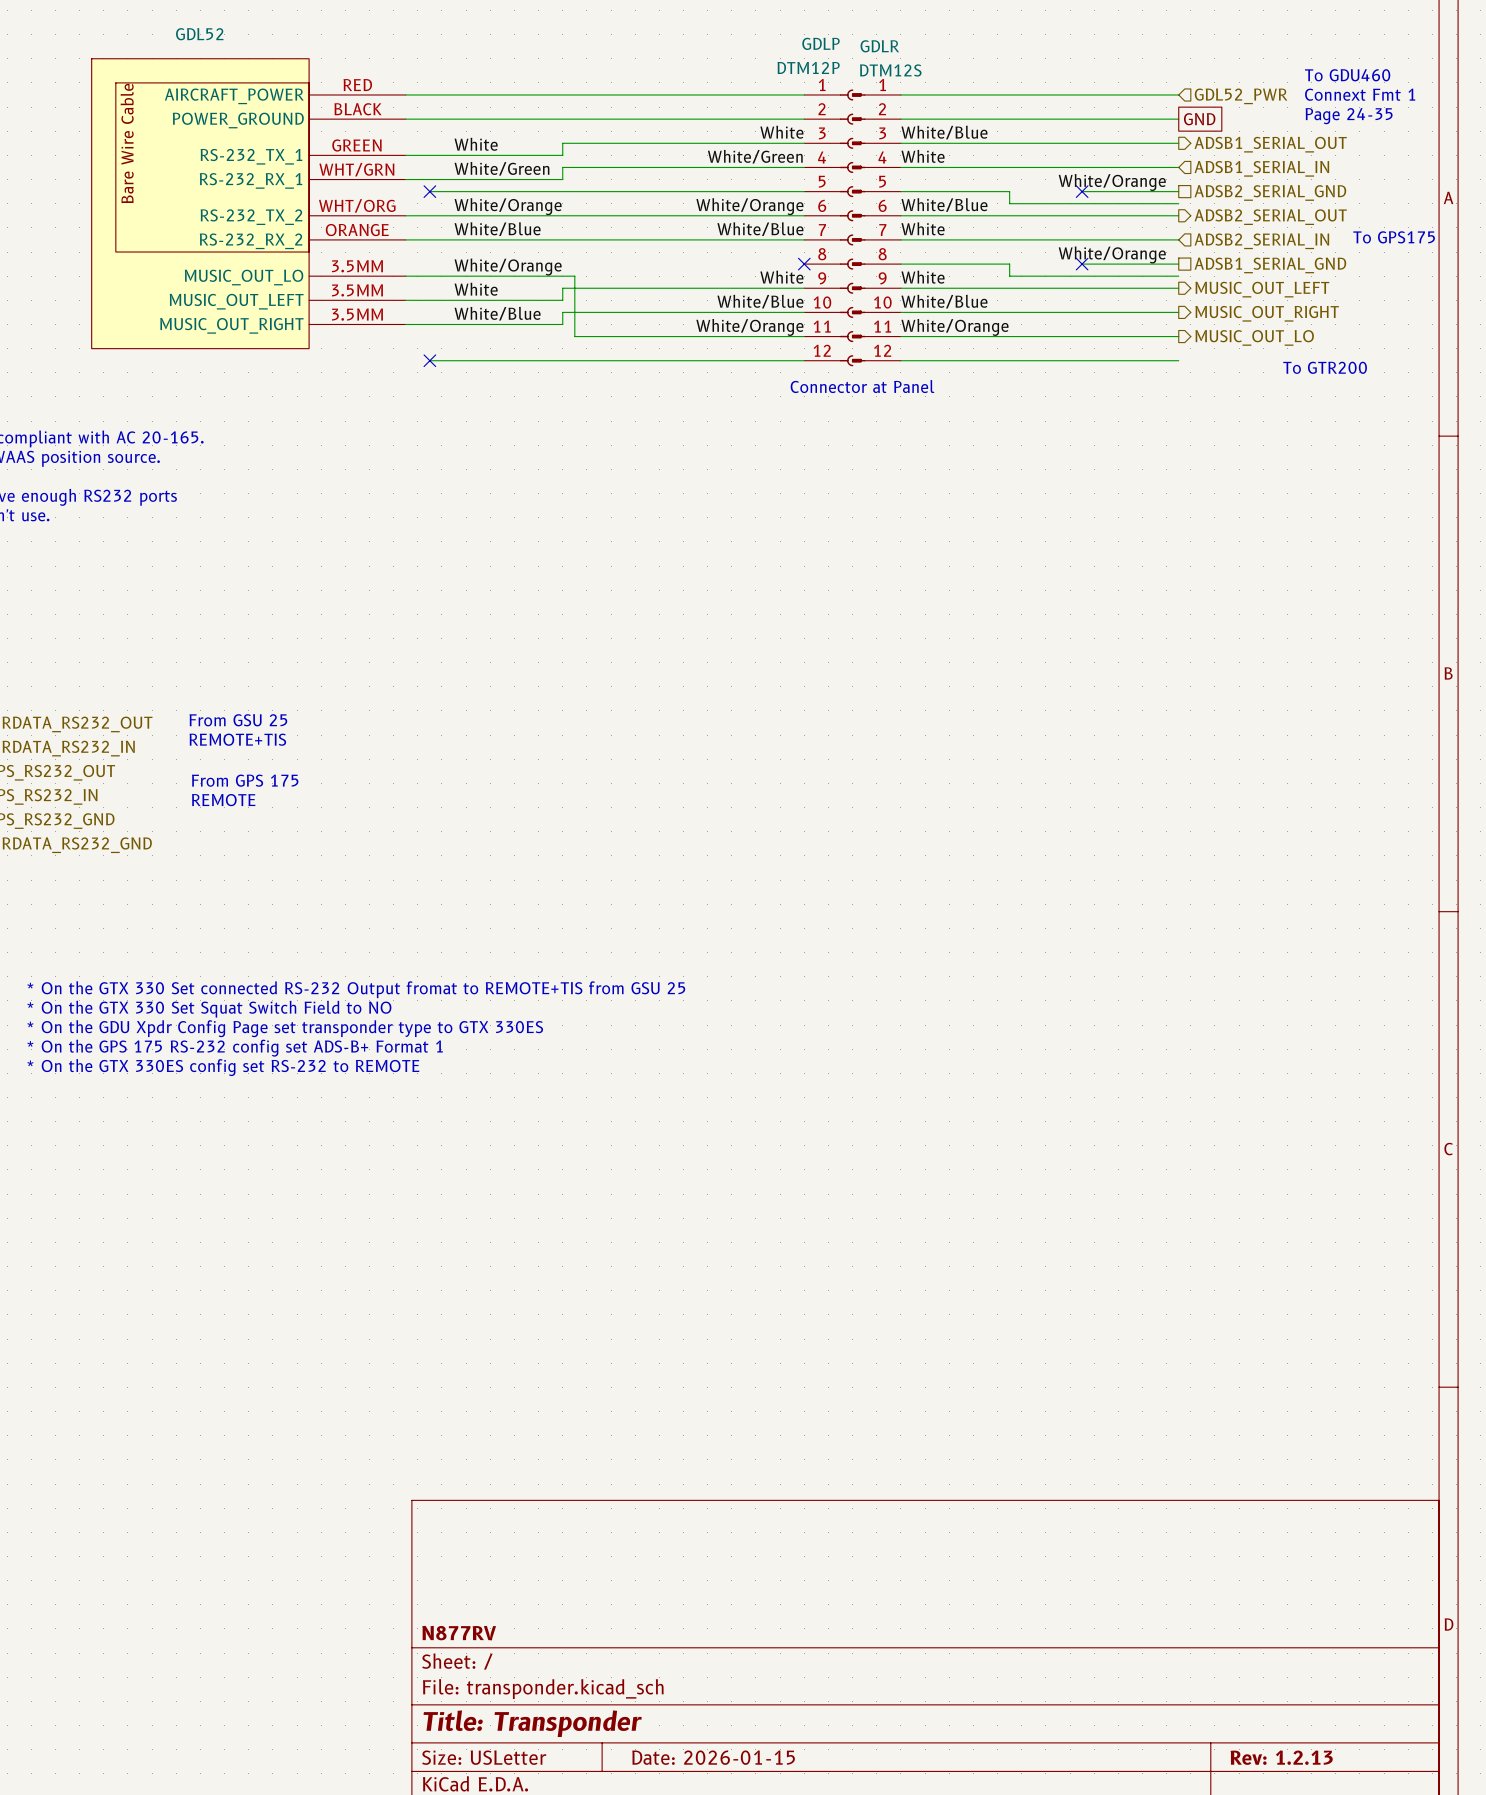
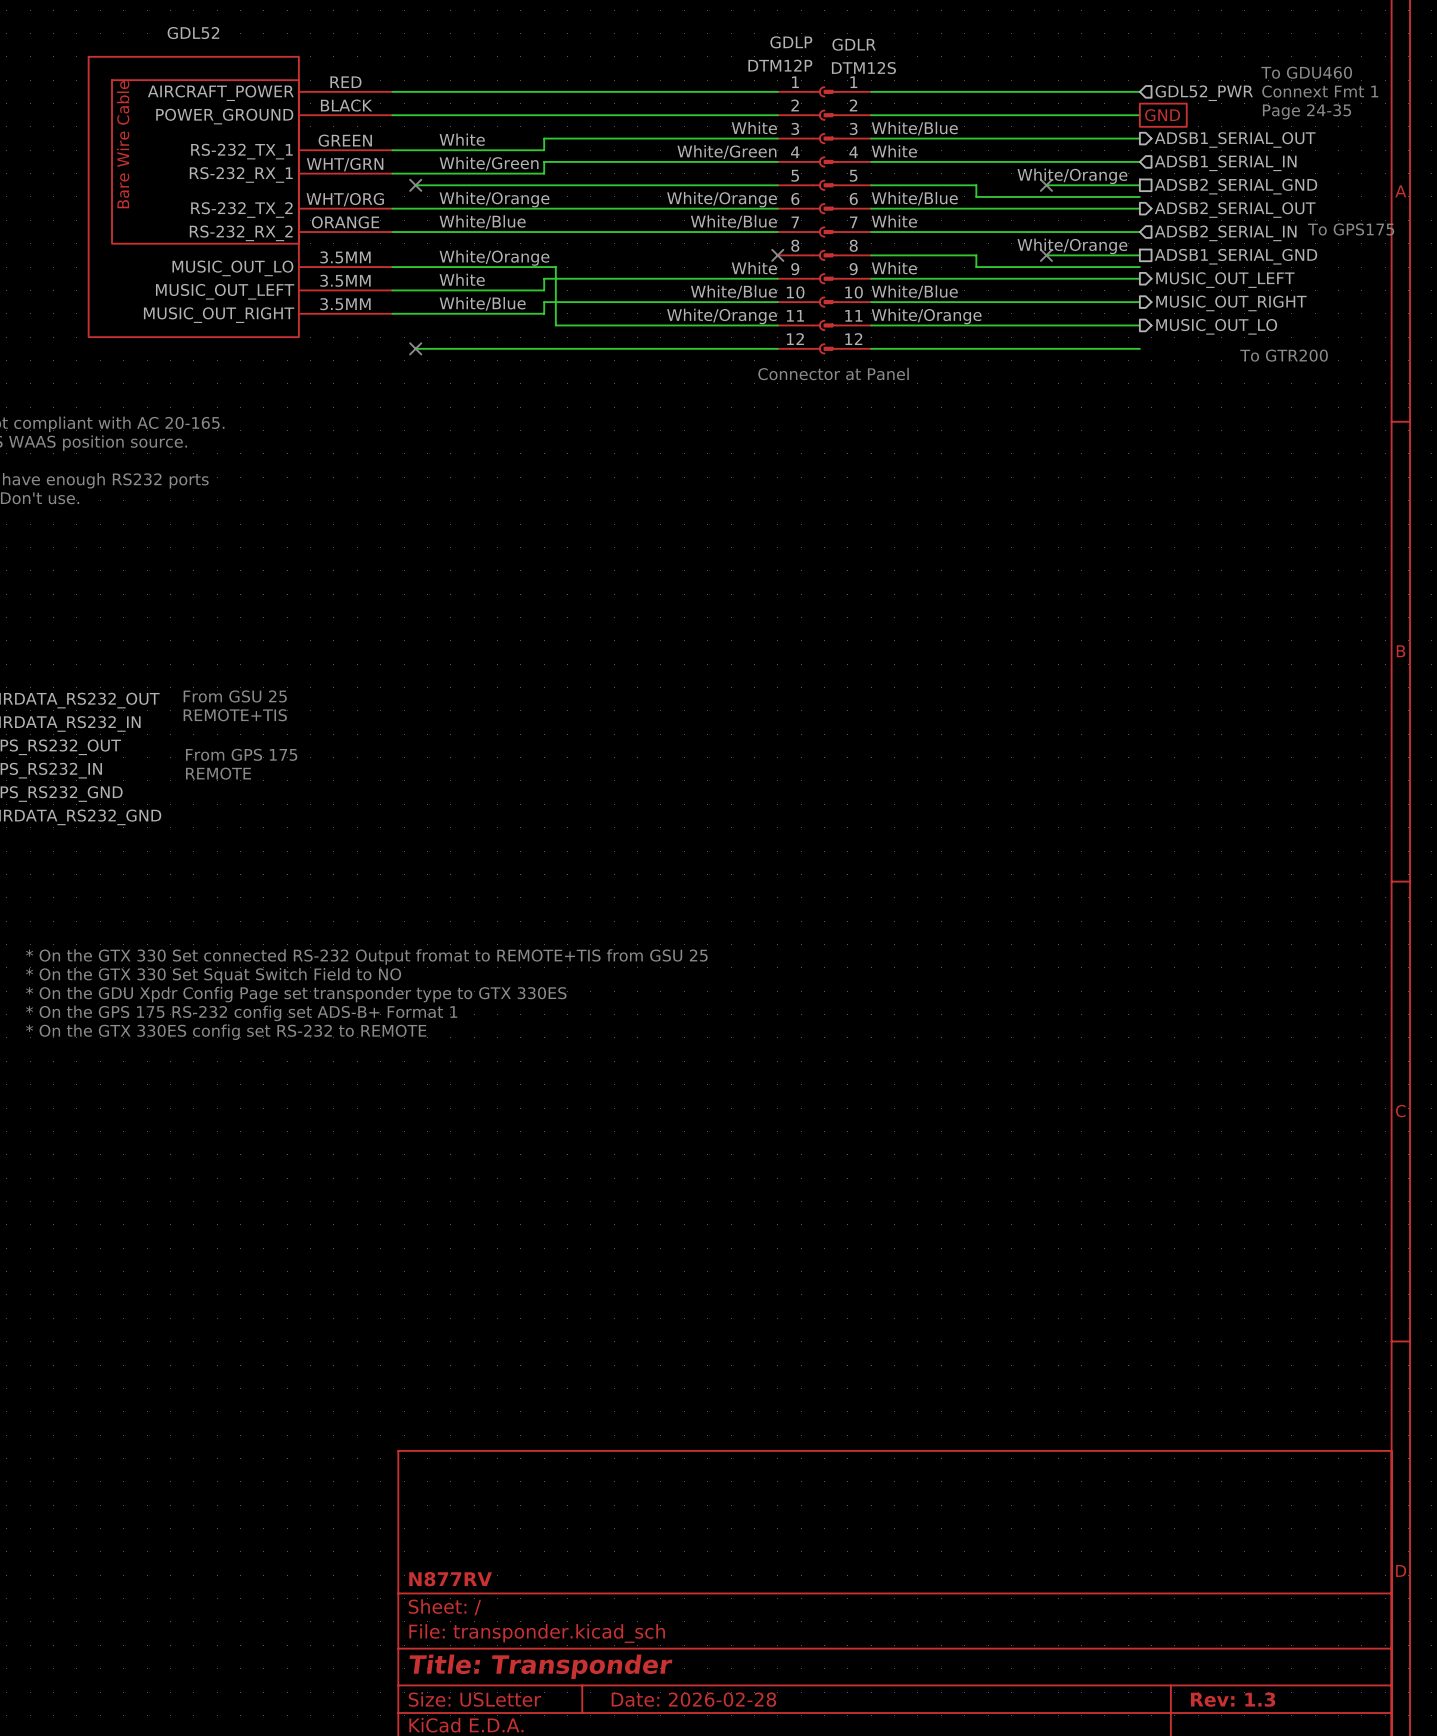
title block: Date: 2026-01-15 (713, 1757) -> Date: 2026-02-28 (693, 1699)
title block: Rev: 1.2.13 (1281, 1757) -> Rev: 1.3 (1233, 1699)

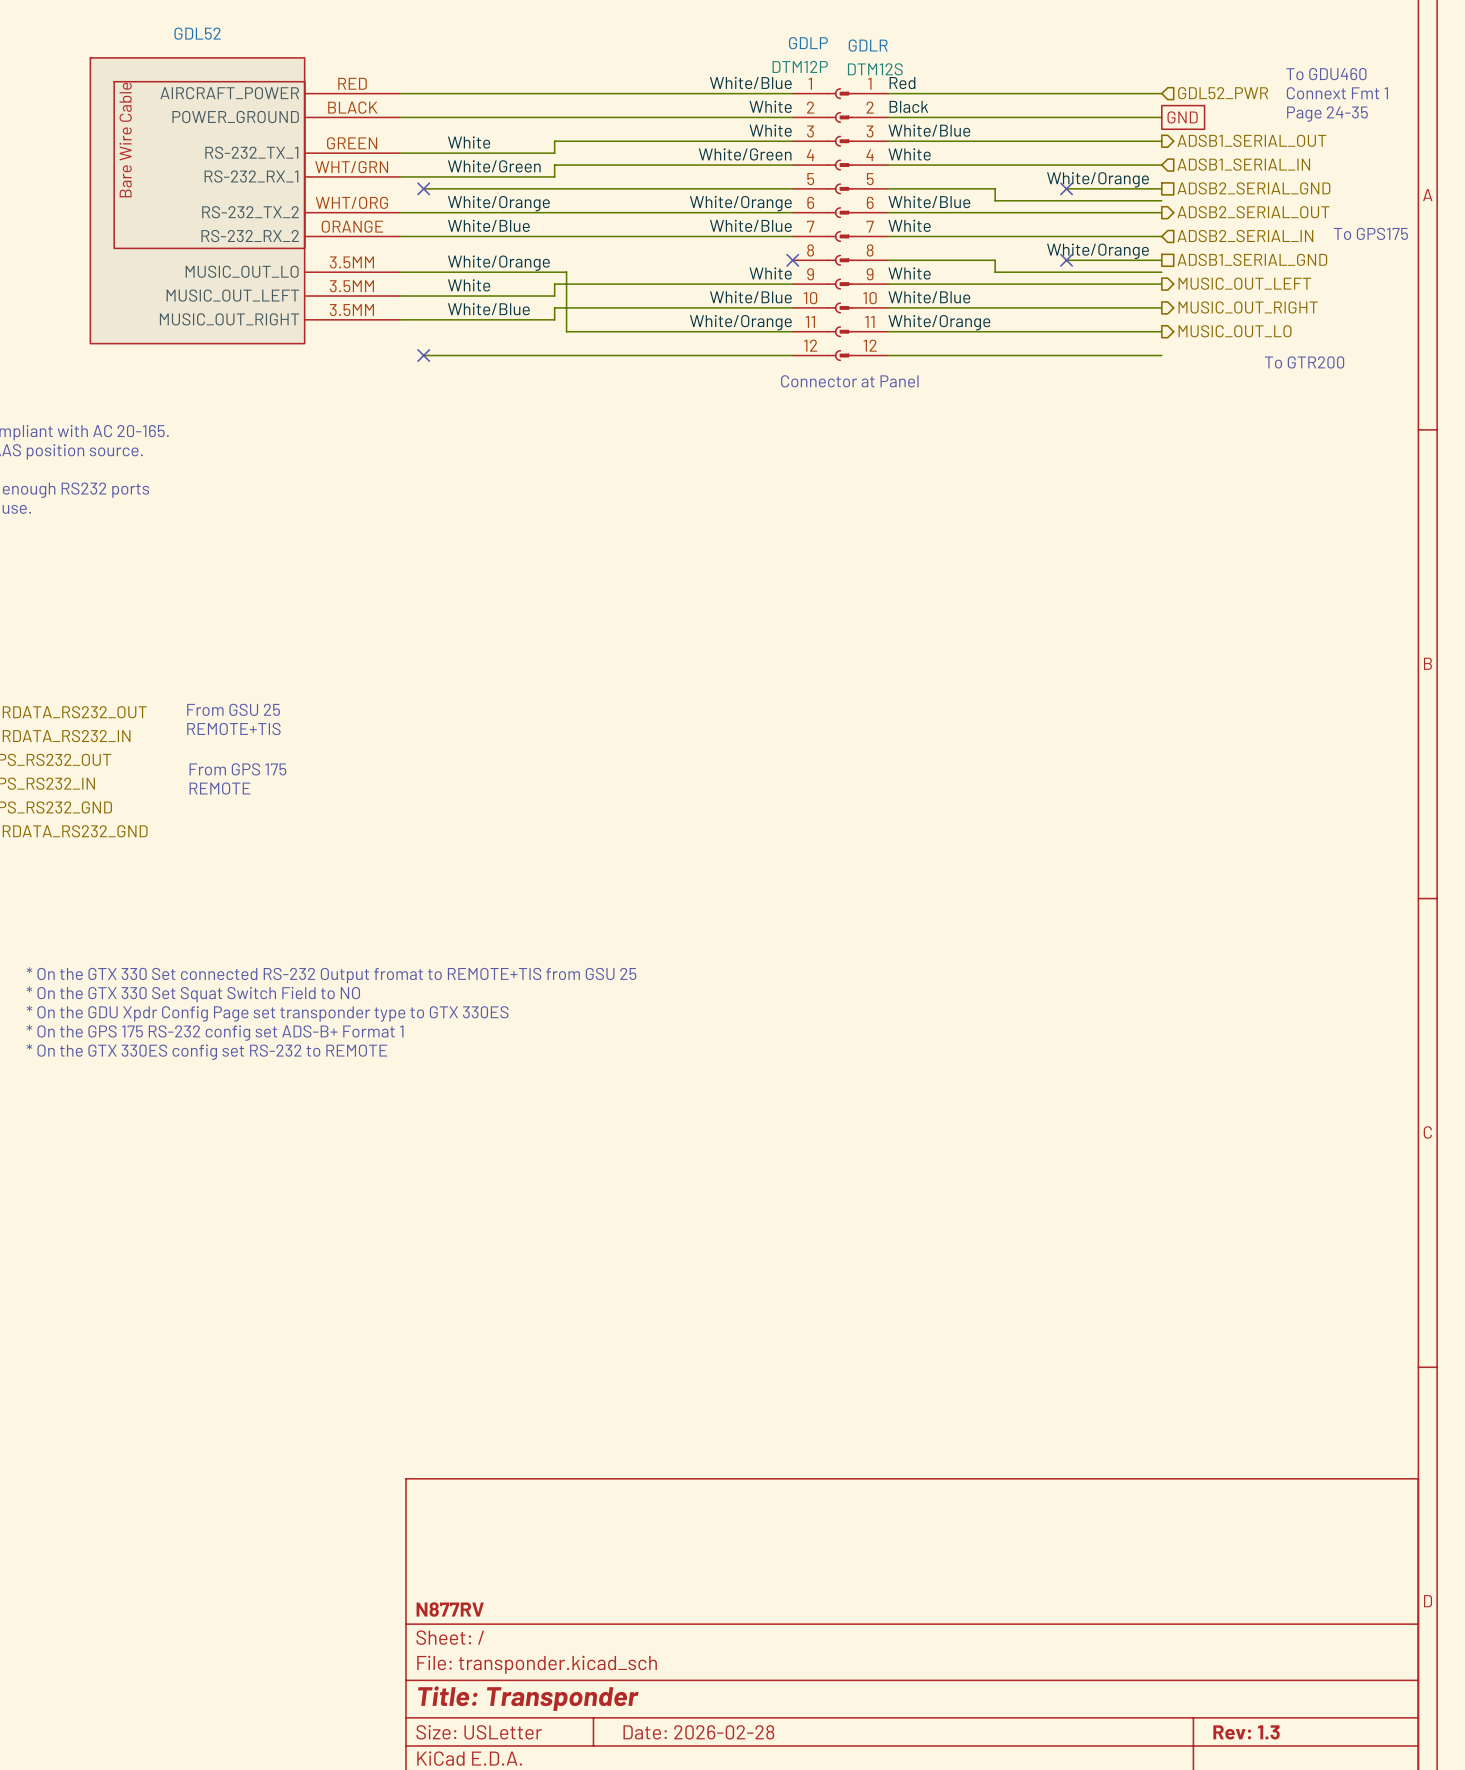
label: none -> White/Blue (750, 82)
label: none -> Red (902, 83)
label: none -> White (770, 106)
label: none -> Black (908, 106)

